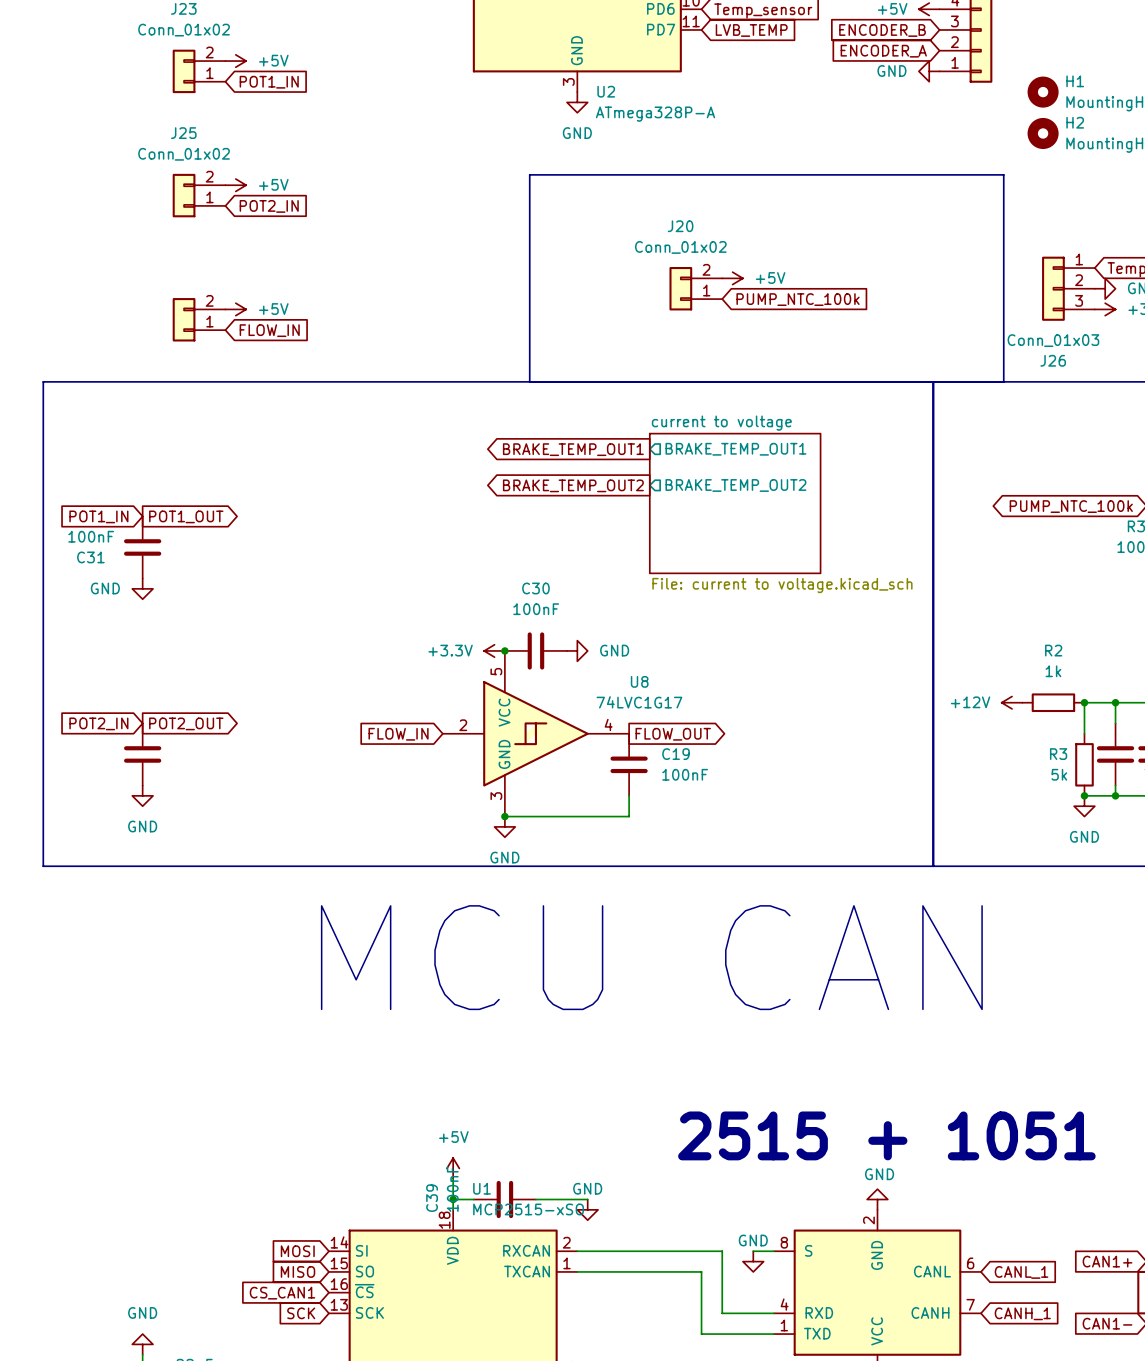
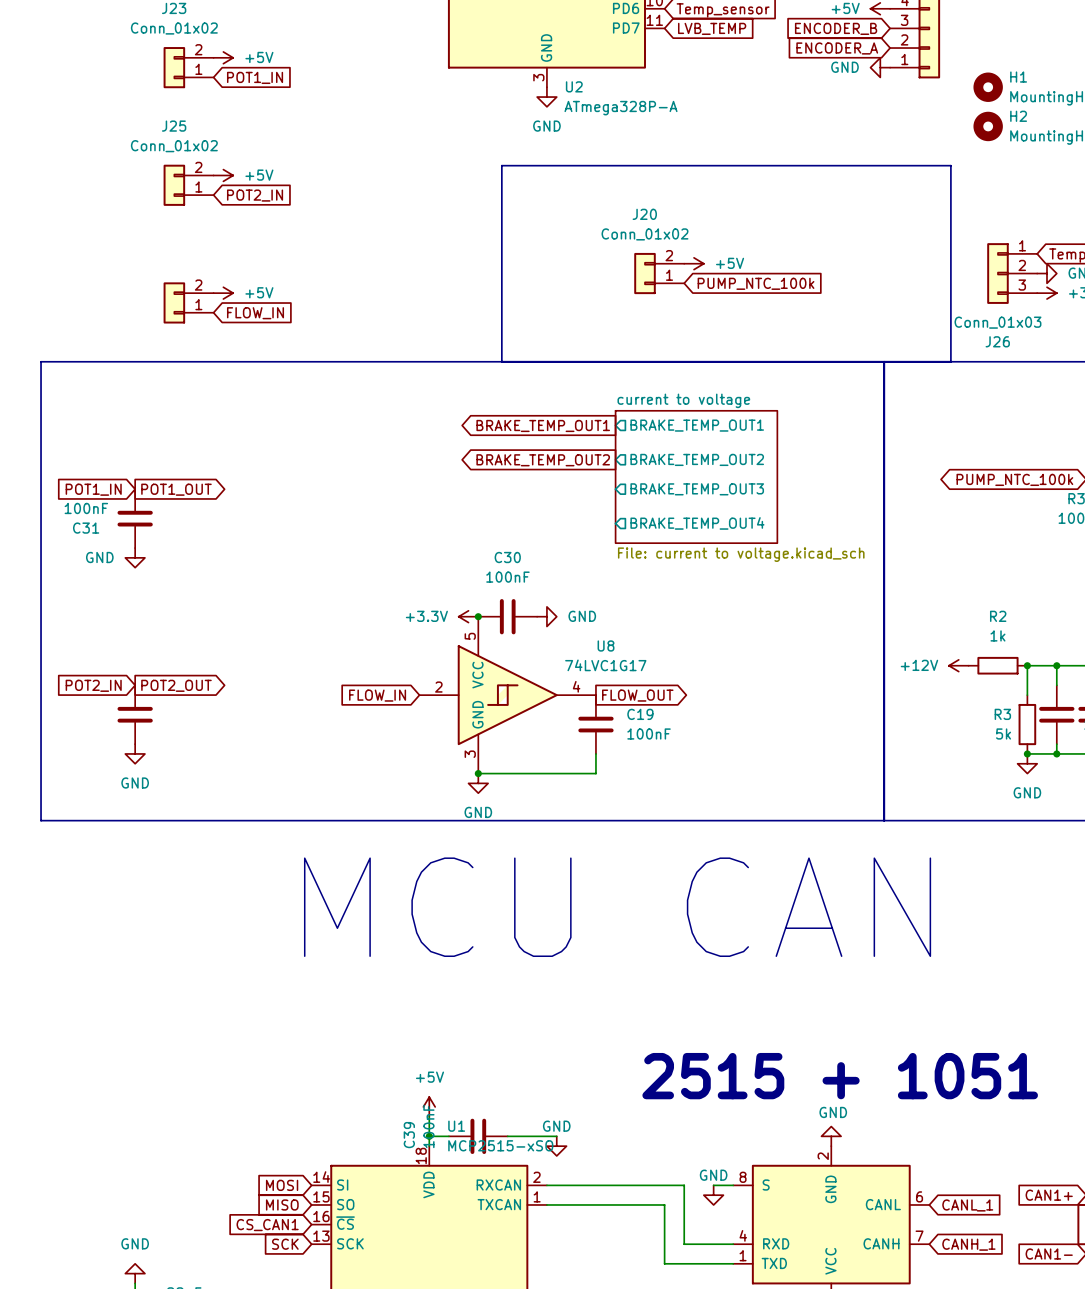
sheet pin: none -> BRAKE_TEMP_OUT3 (697, 489)
sheet pin: none -> BRAKE_TEMP_OUT4 (697, 523)

